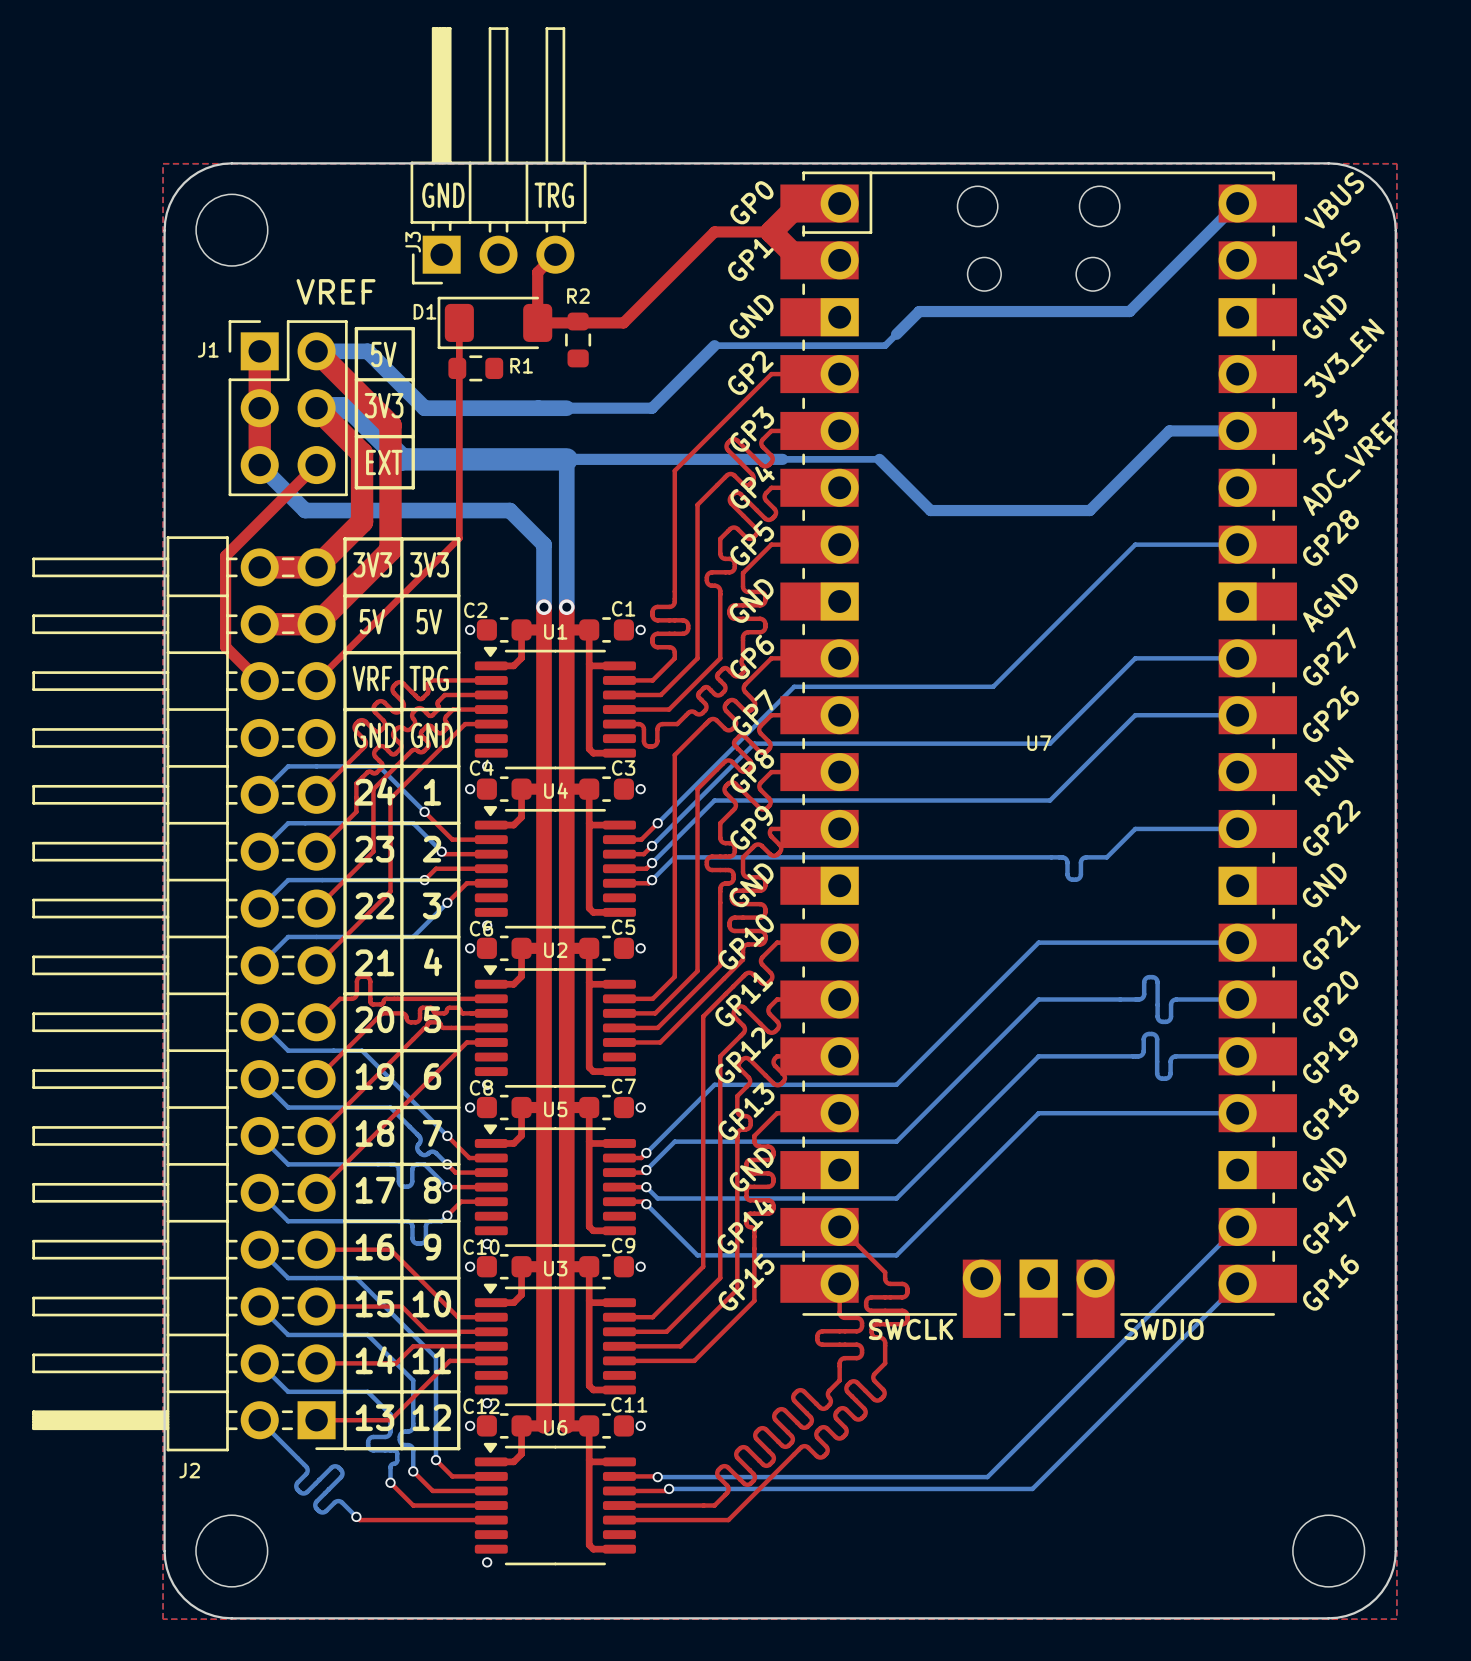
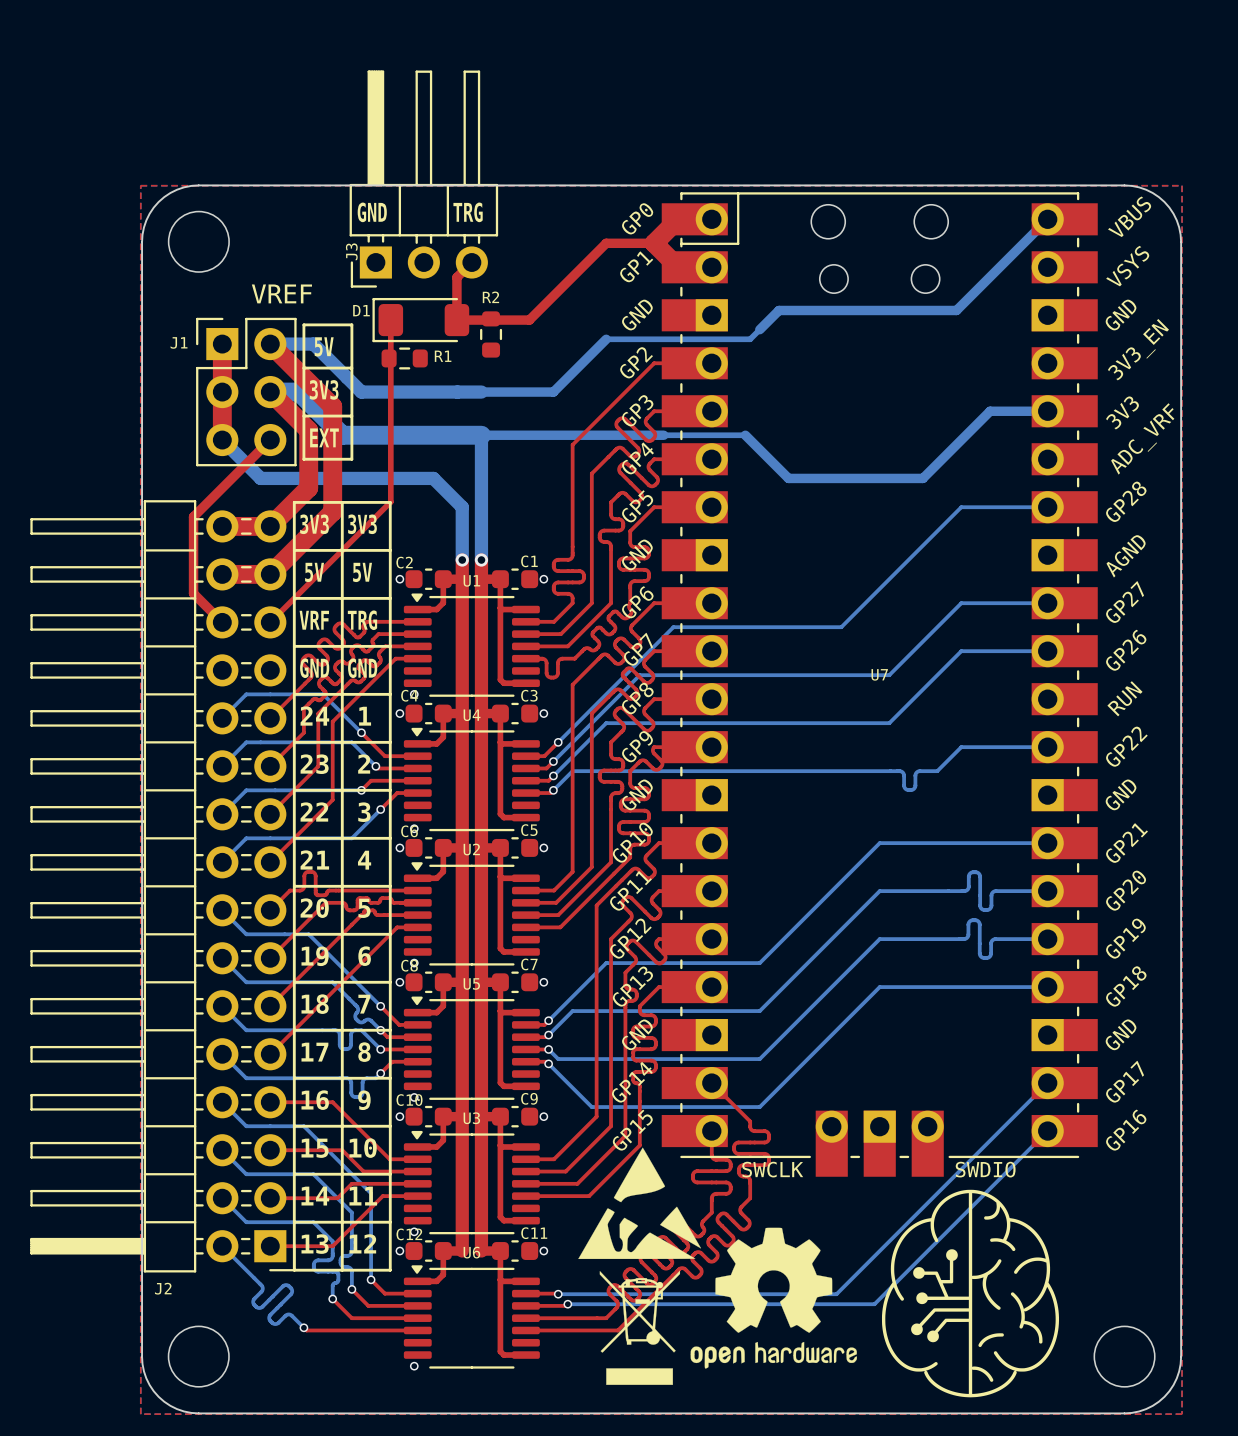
U7 text: ADC_VREF (1350, 463) -> ADC_VRF (1142, 438)
drawing: none -> [578, 1147, 857, 1385]
drawing: none -> [881, 1189, 1060, 1398]

